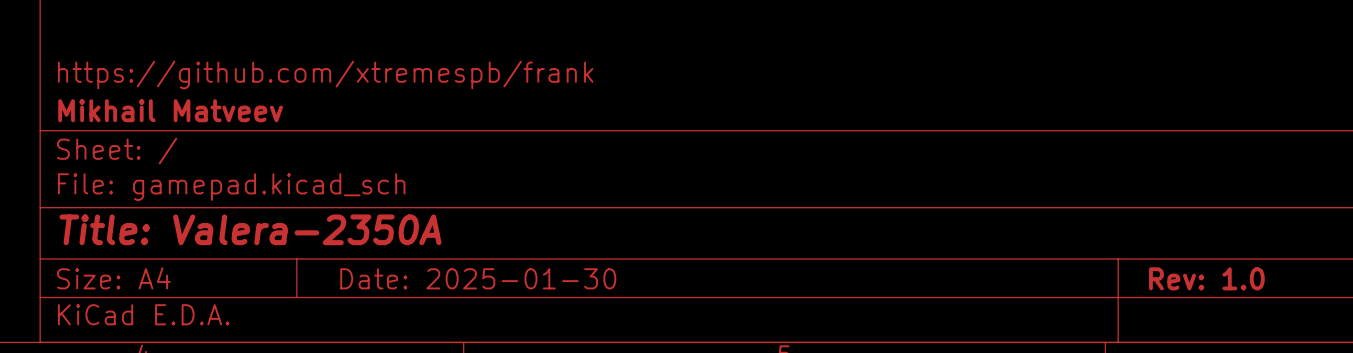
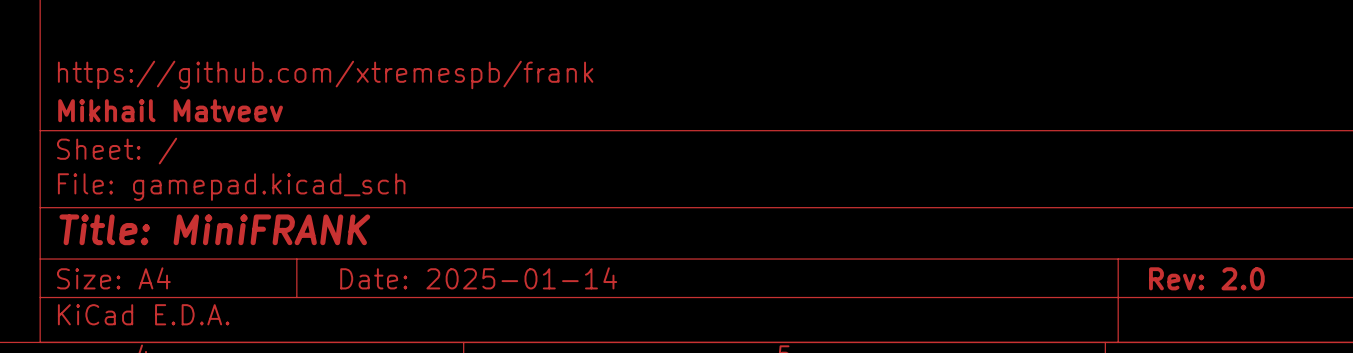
title block: Title: Valera-2350A (250, 229) -> Title: MiniFRANK (214, 229)
title block: Date: 2025-01-30 (478, 278) -> Date: 2025-01-14 (478, 278)
title block: Rev: 1.0 (1206, 278) -> Rev: 2.0 (1206, 278)

